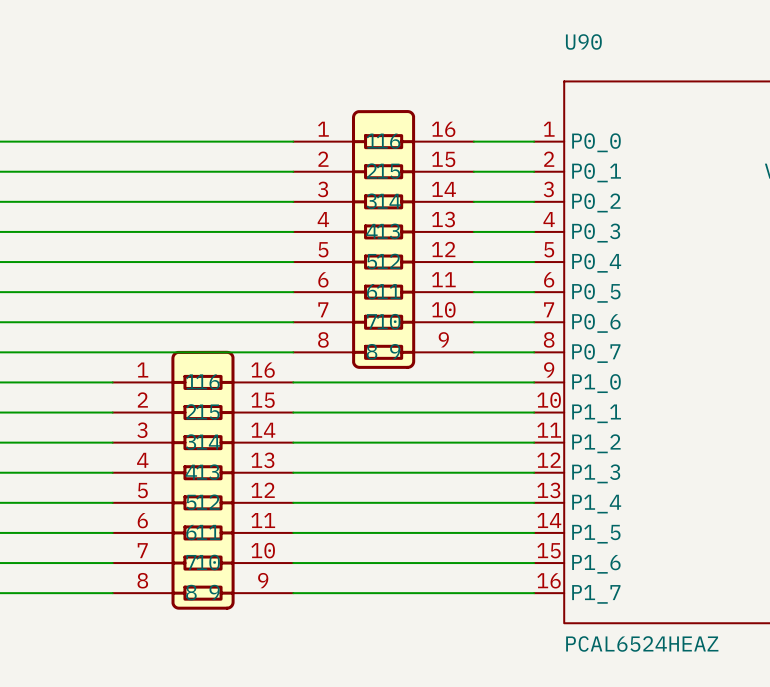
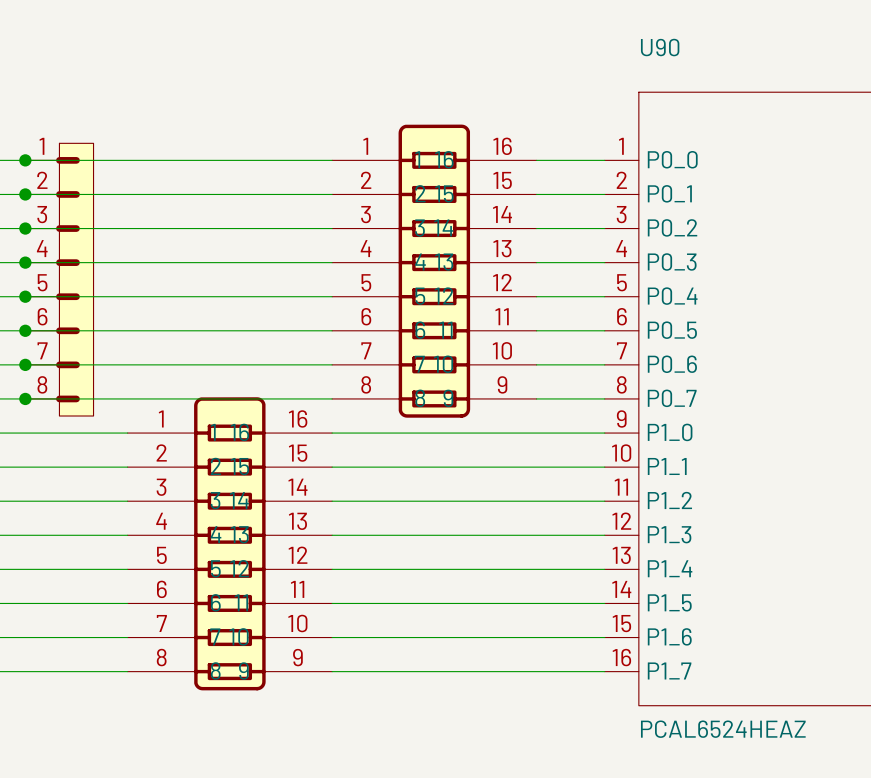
junction: none -> (25, 160)
junction: none -> (25, 194)
junction: none -> (25, 228)
junction: none -> (25, 262)
part: none -> (59, 279)
junction: none -> (25, 296)
junction: none -> (25, 330)
junction: none -> (25, 364)
junction: none -> (25, 398)

